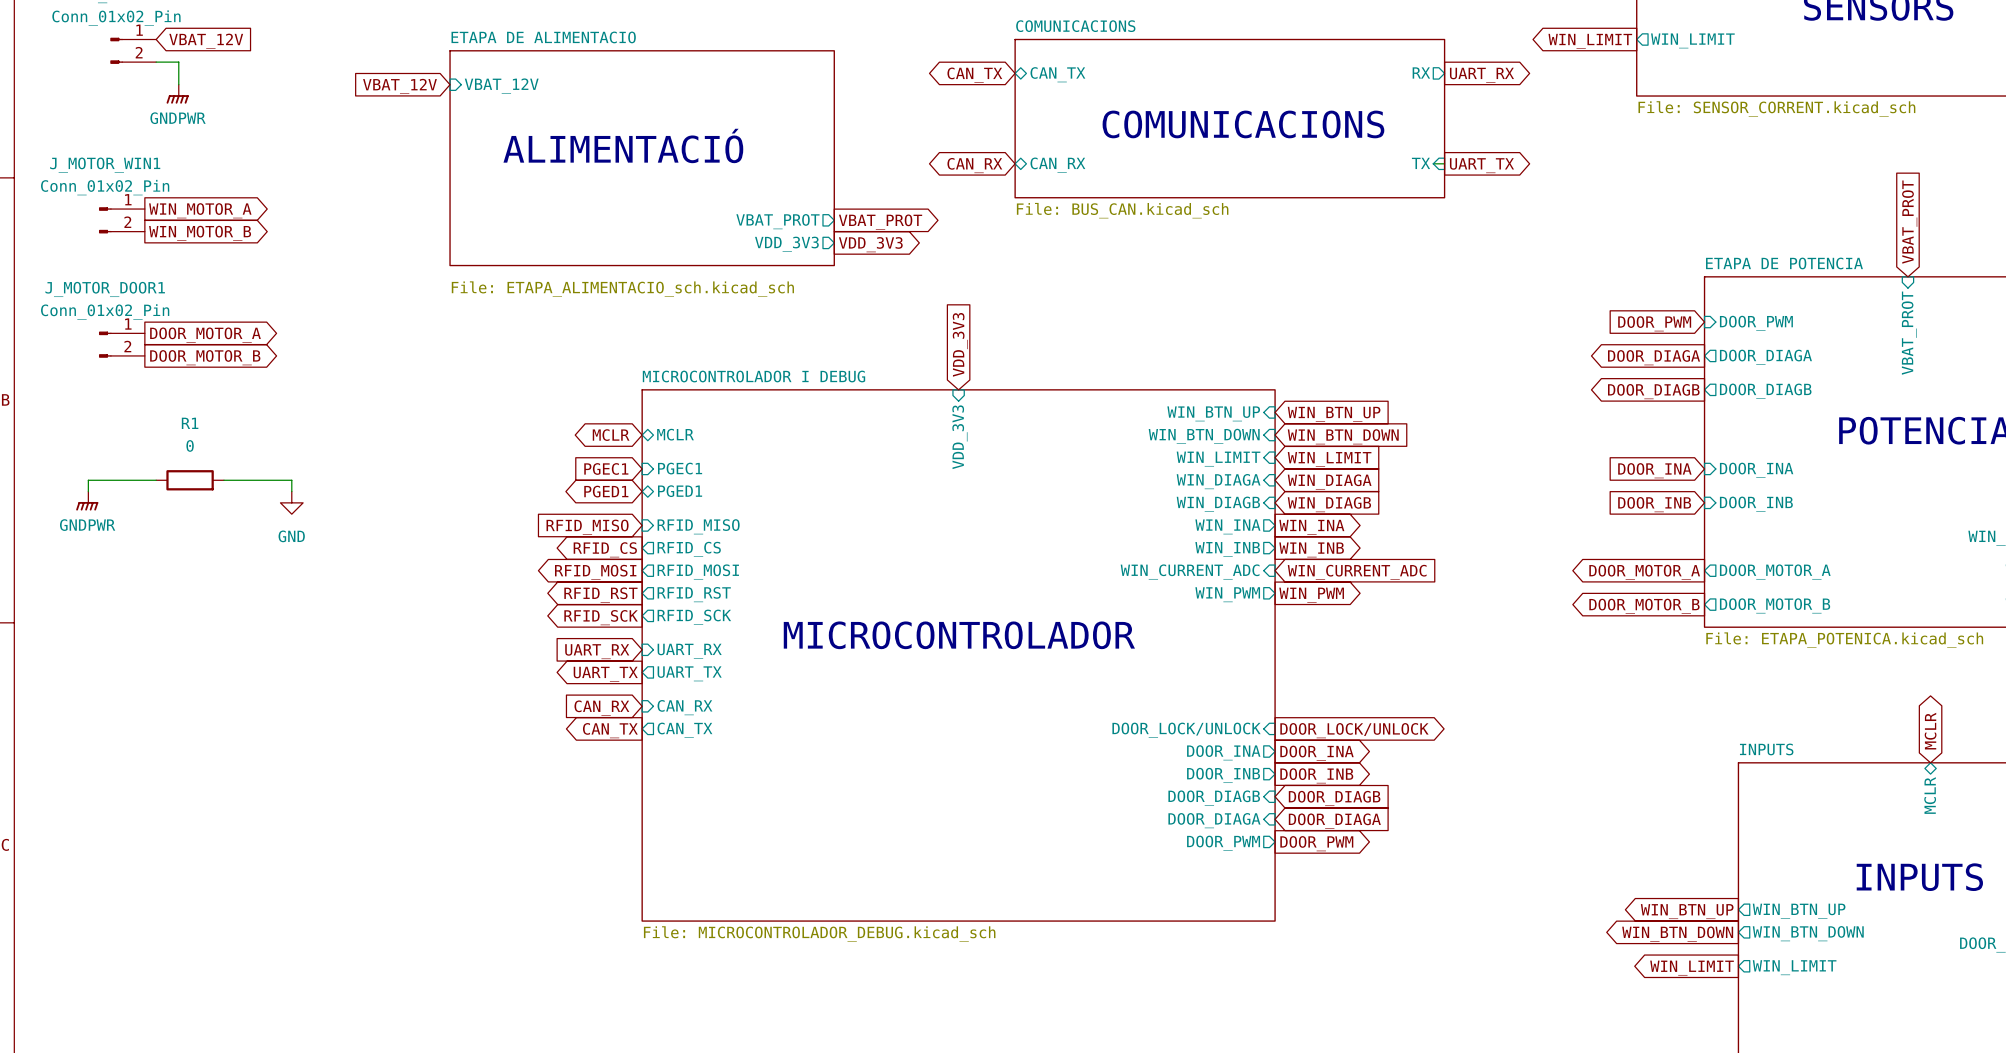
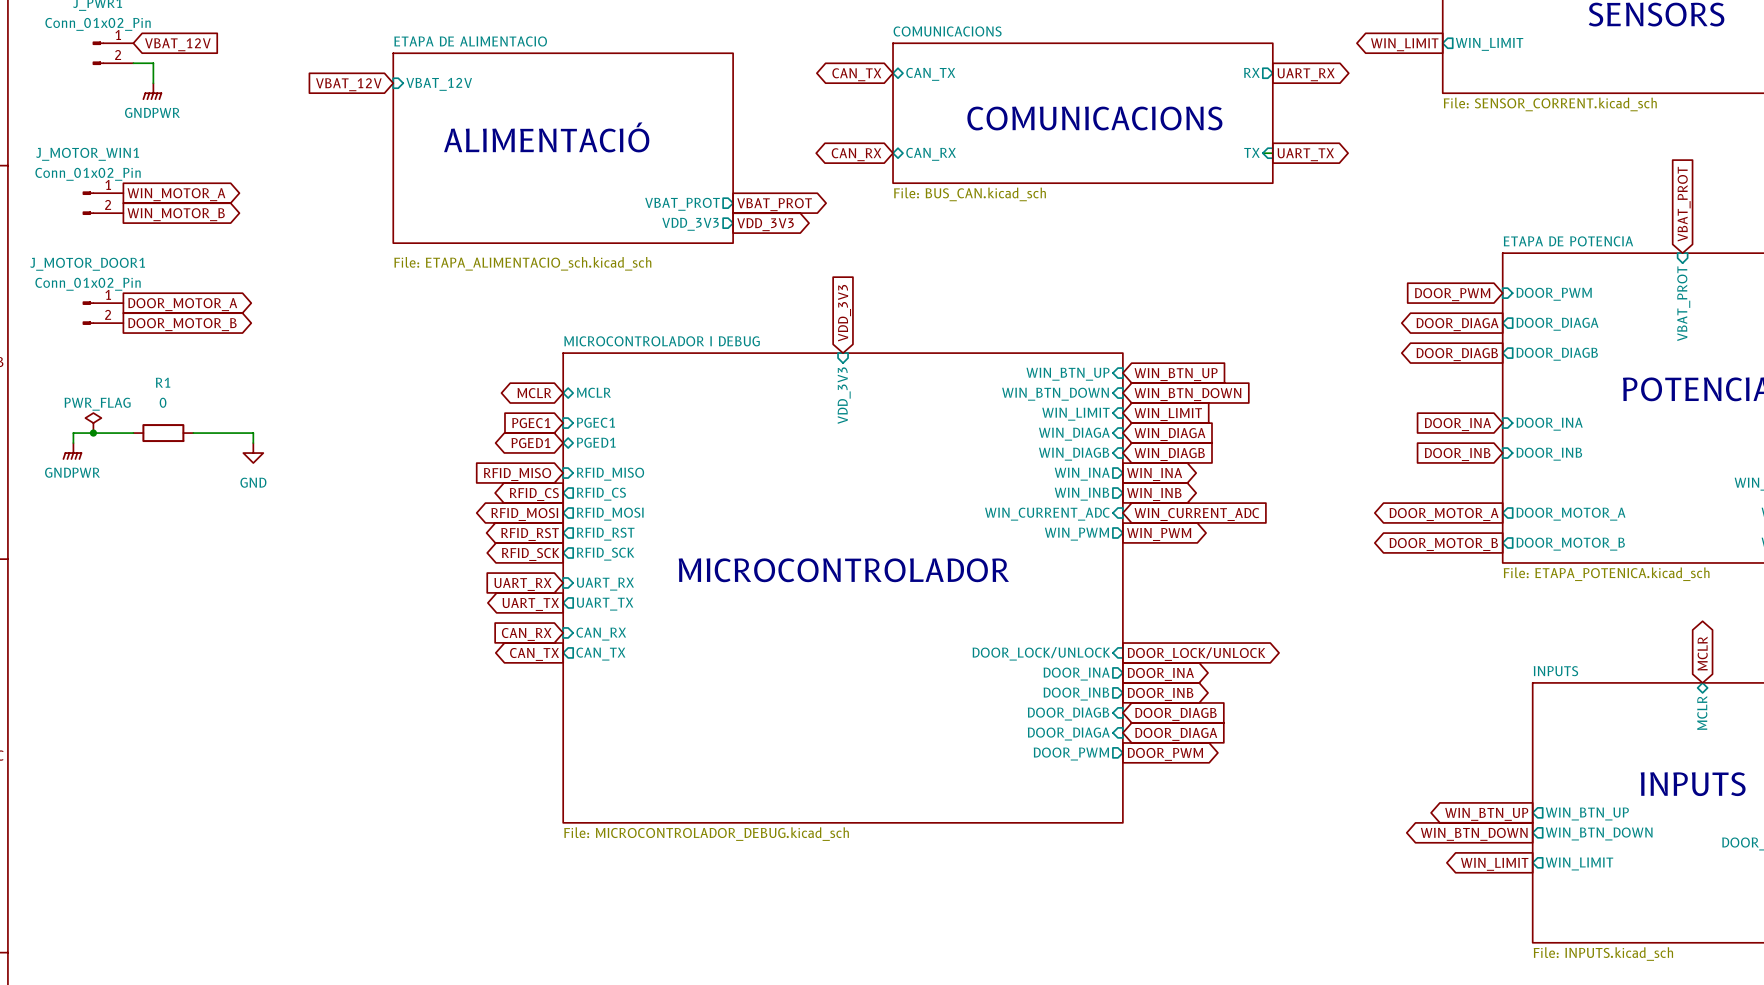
power symbol: none -> PWR_FLAG (93, 423)
junction: none -> (93, 433)

